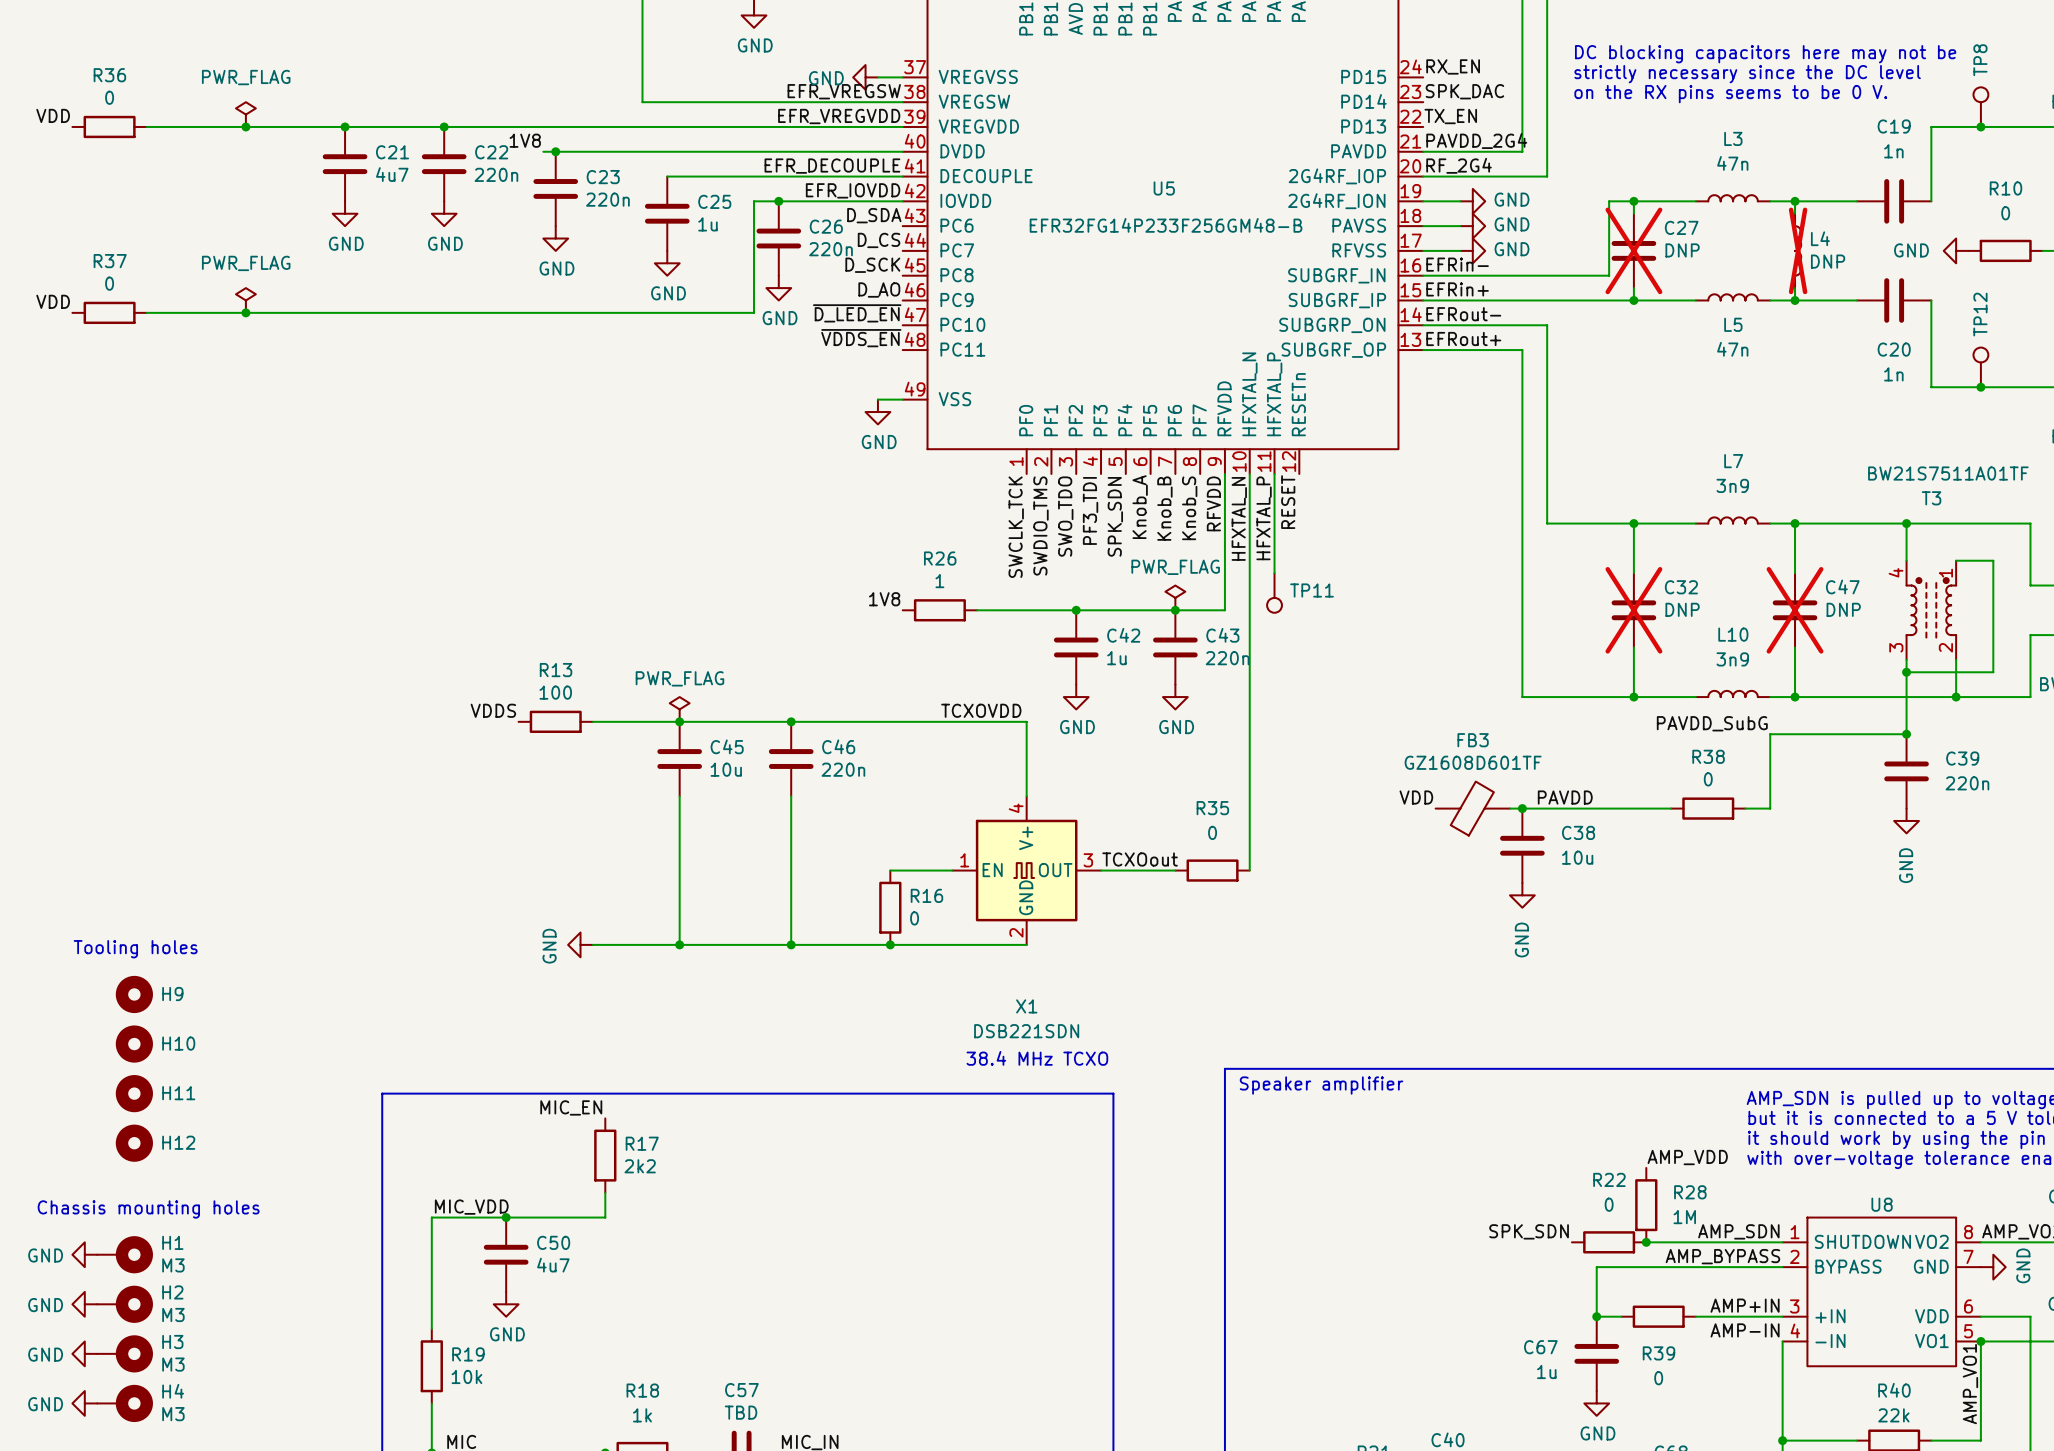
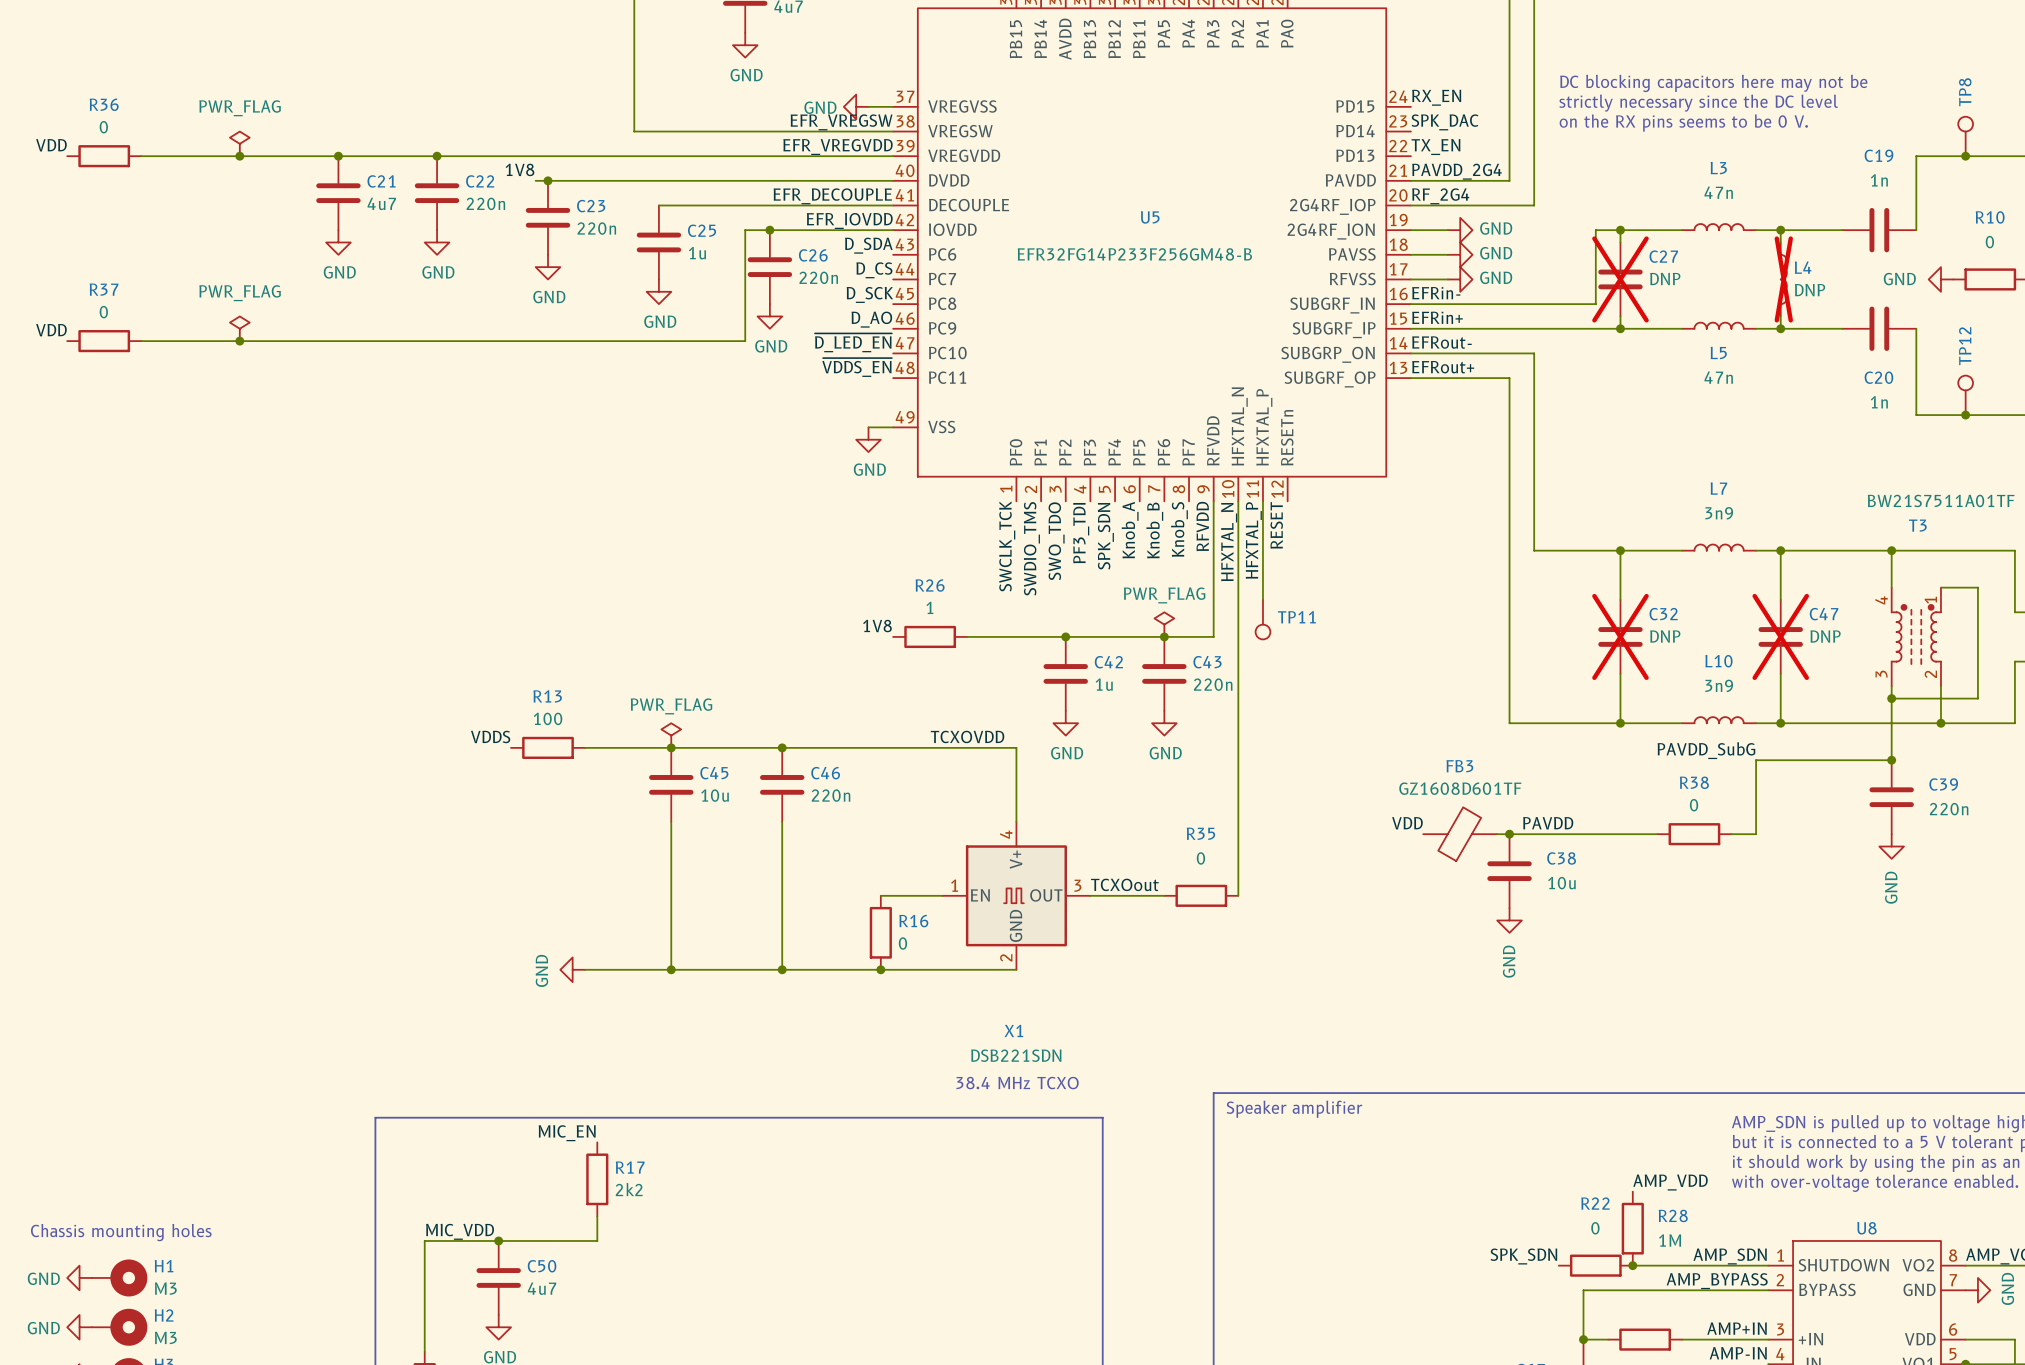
text: Tooling holes (135, 949) -> none
H9: (134, 994) -> none
H10: (134, 1044) -> none
H11: (134, 1093) -> none
H12: (134, 1143) -> none

